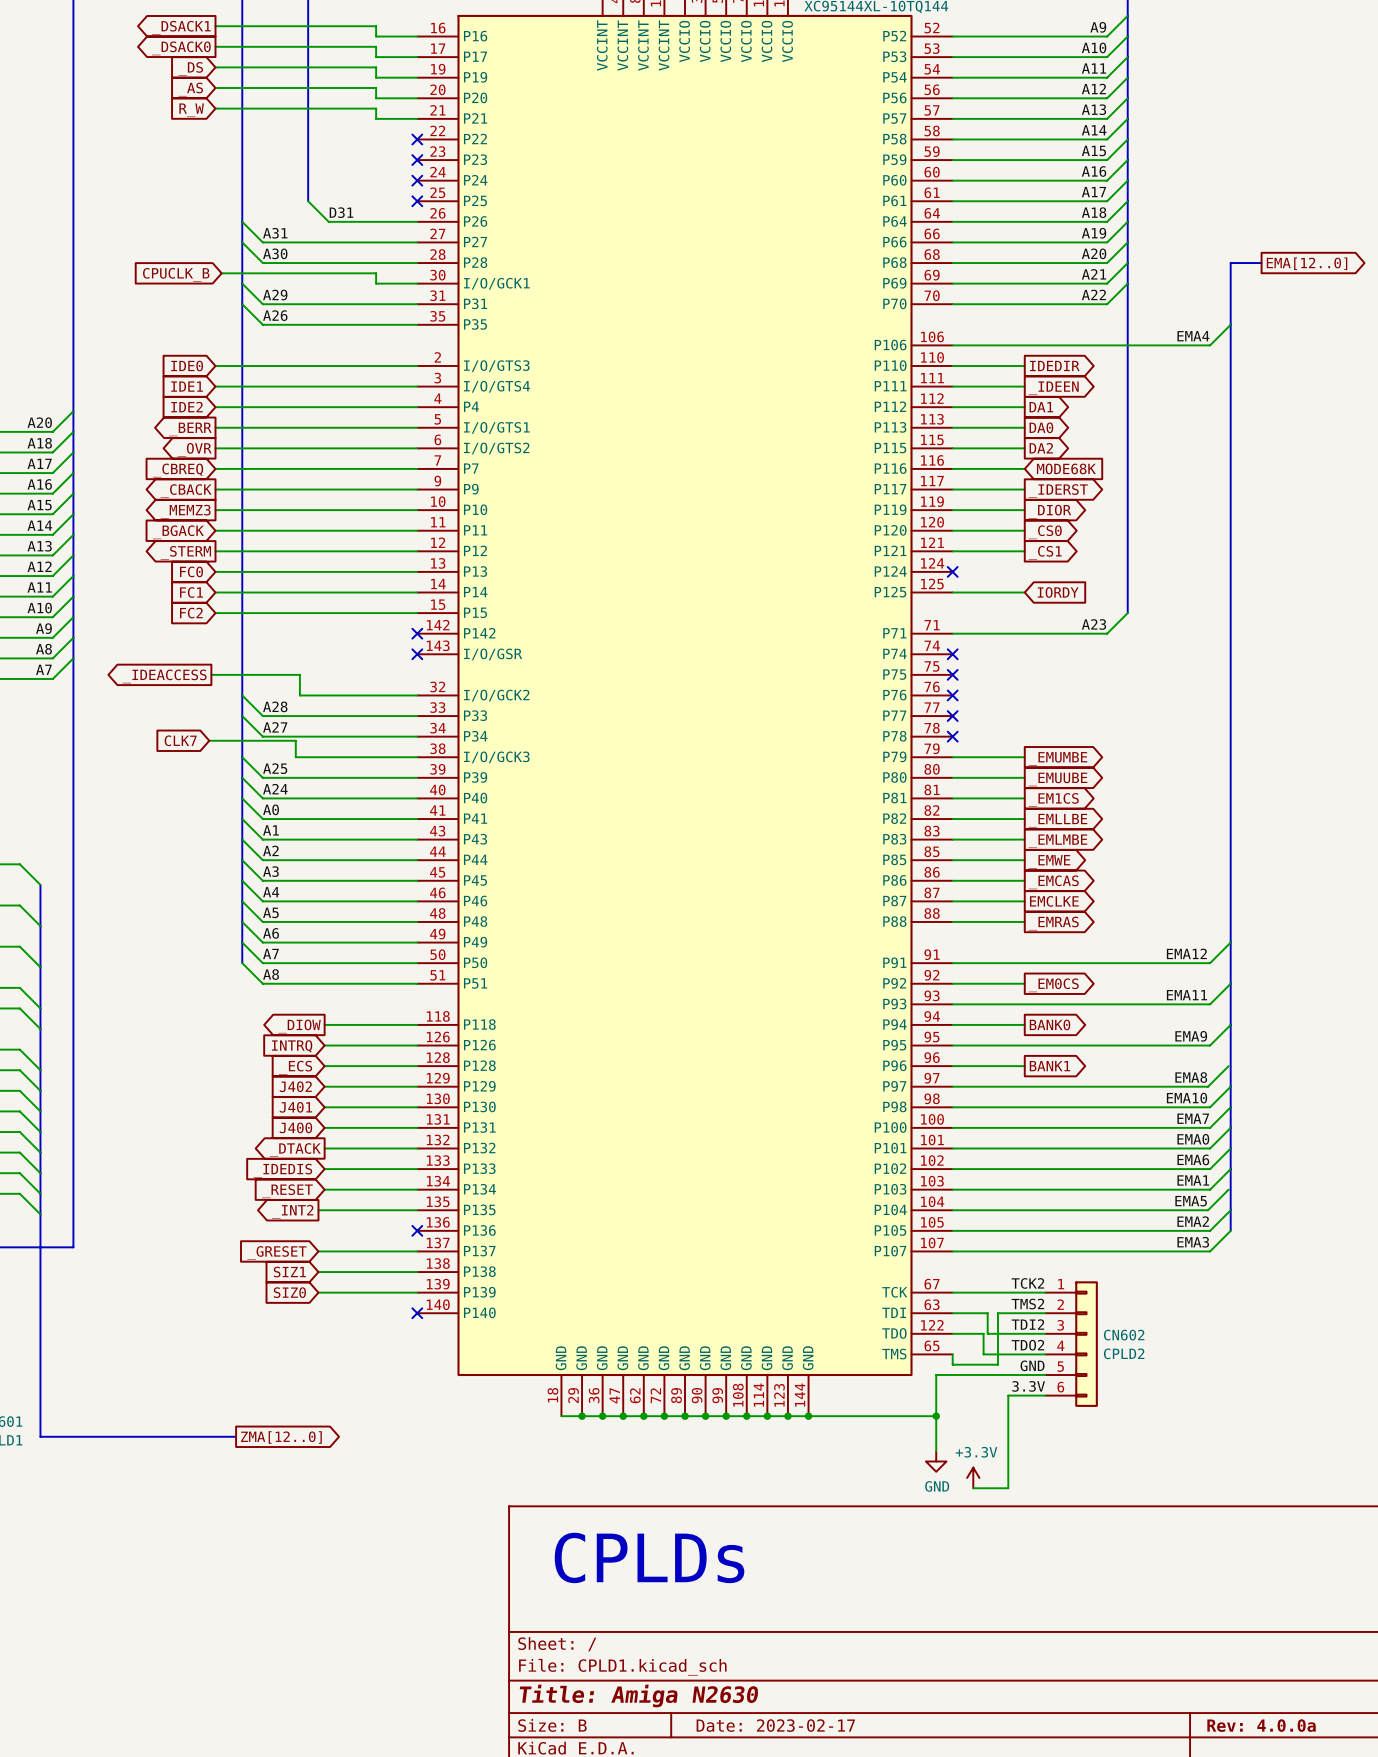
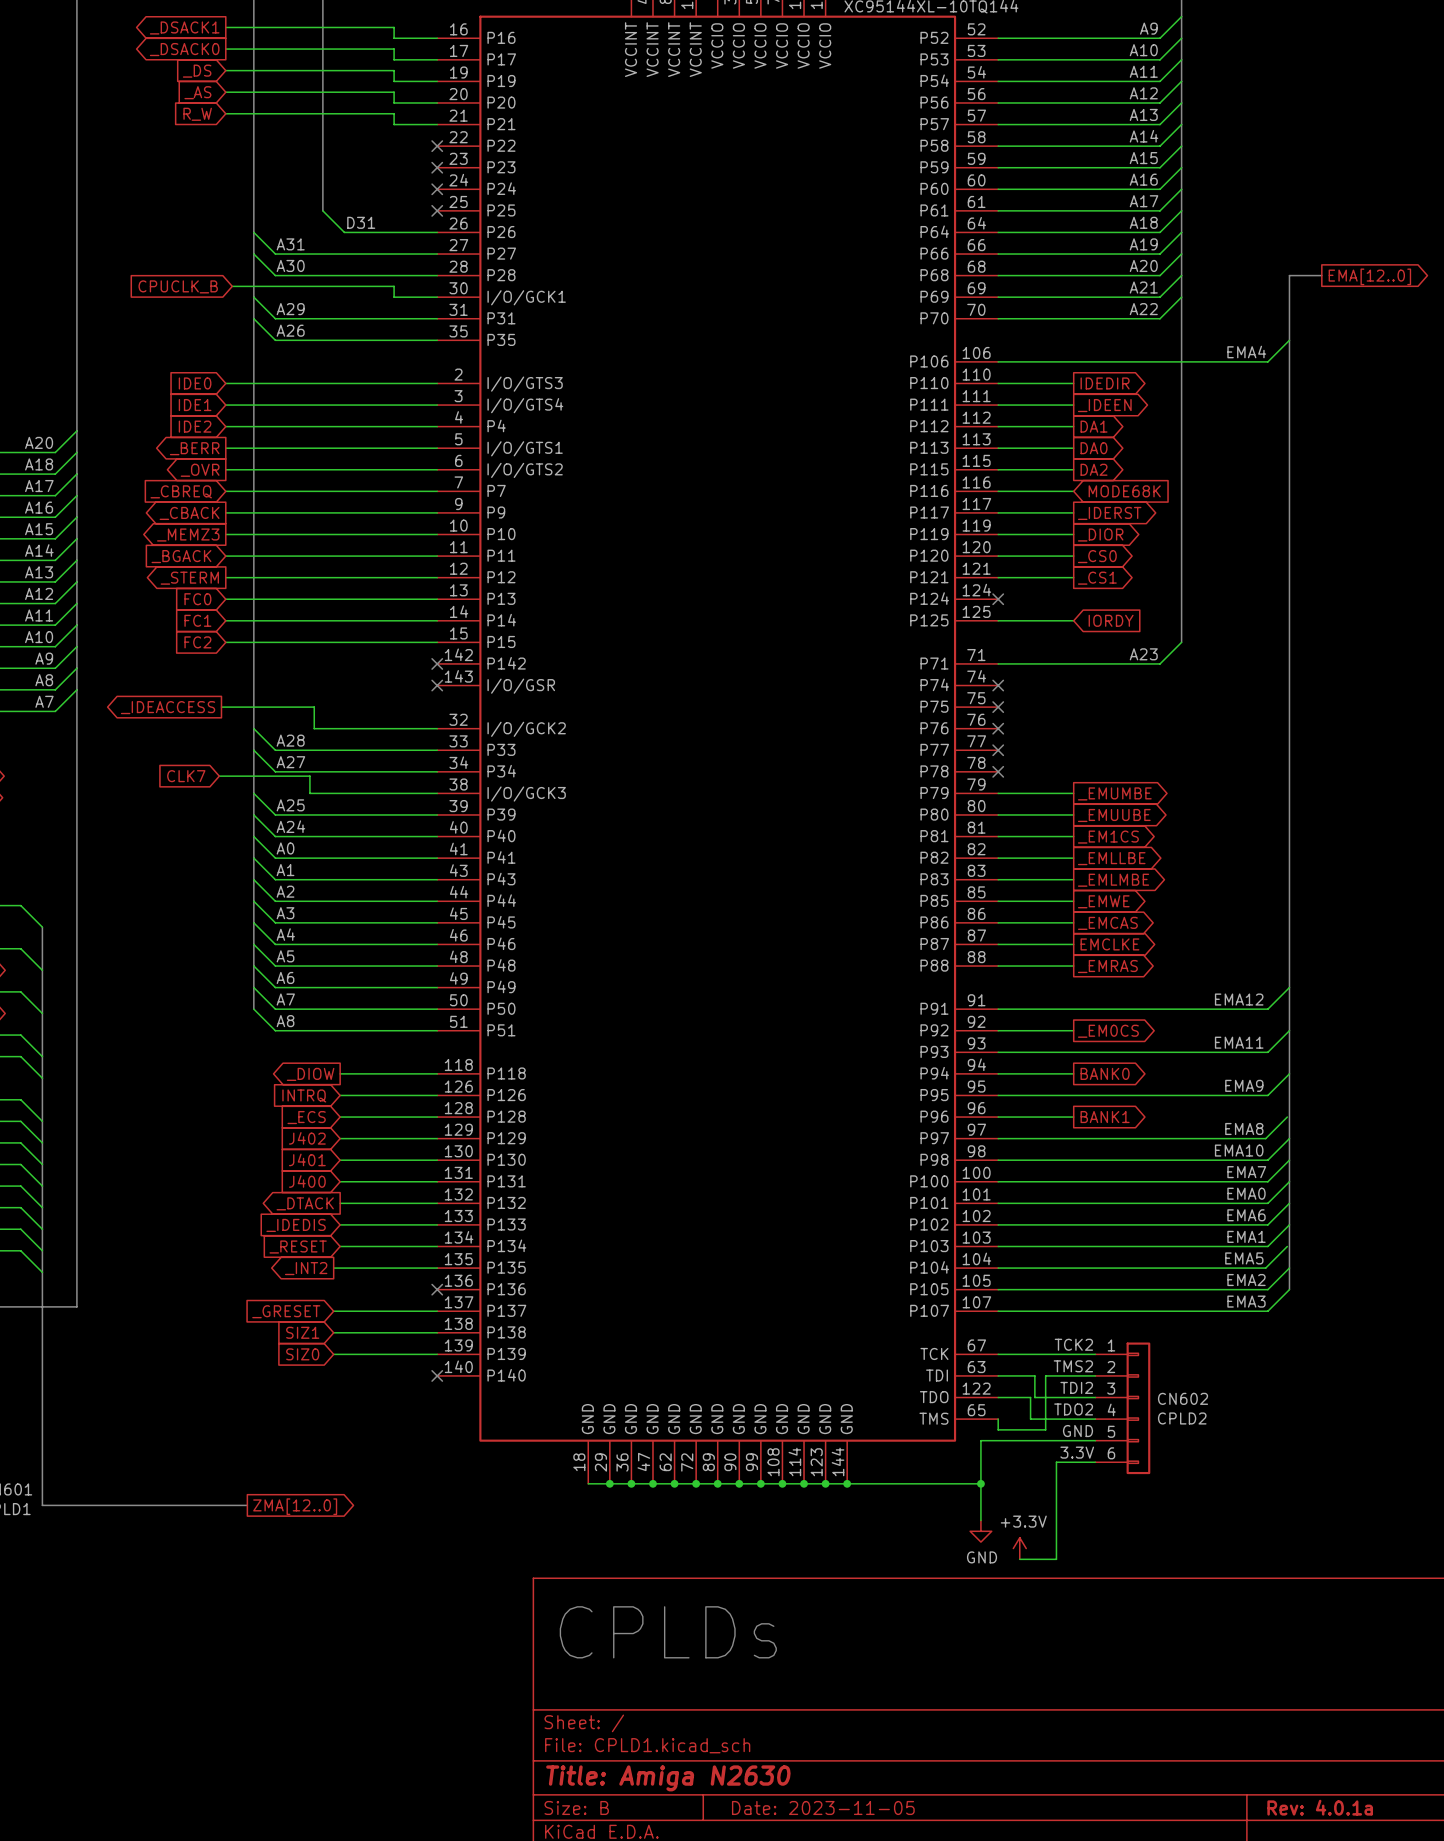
title block: Date: 2023-02-17 (775, 1725) -> Date: 2023-11-05 (823, 1807)
title block: Rev: 4.0.0a (1261, 1725) -> Rev: 4.0.1a (1320, 1807)

